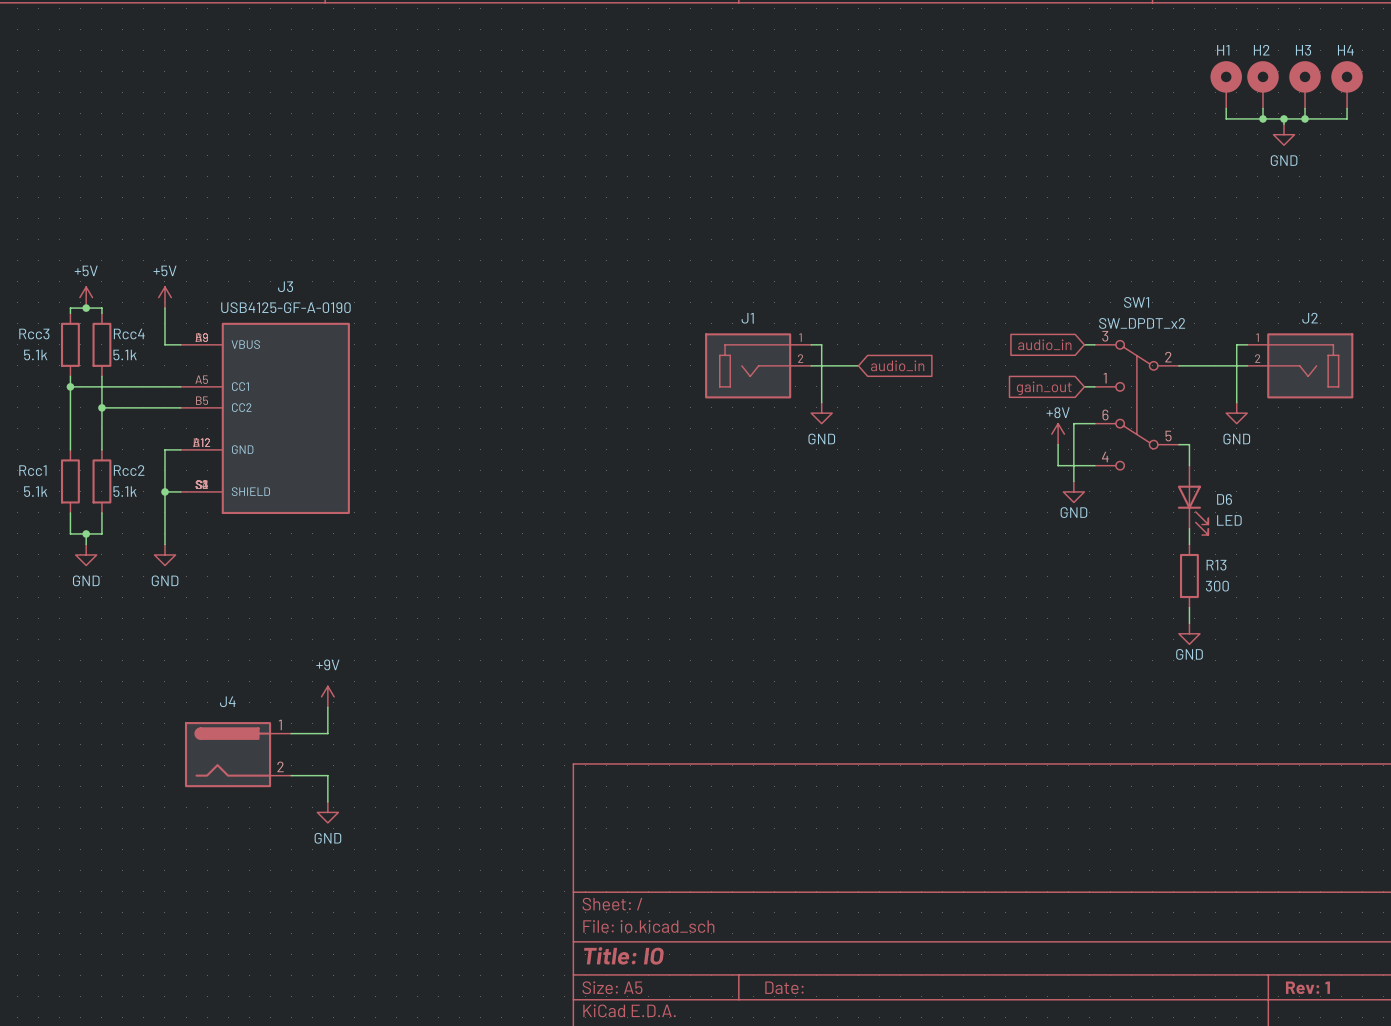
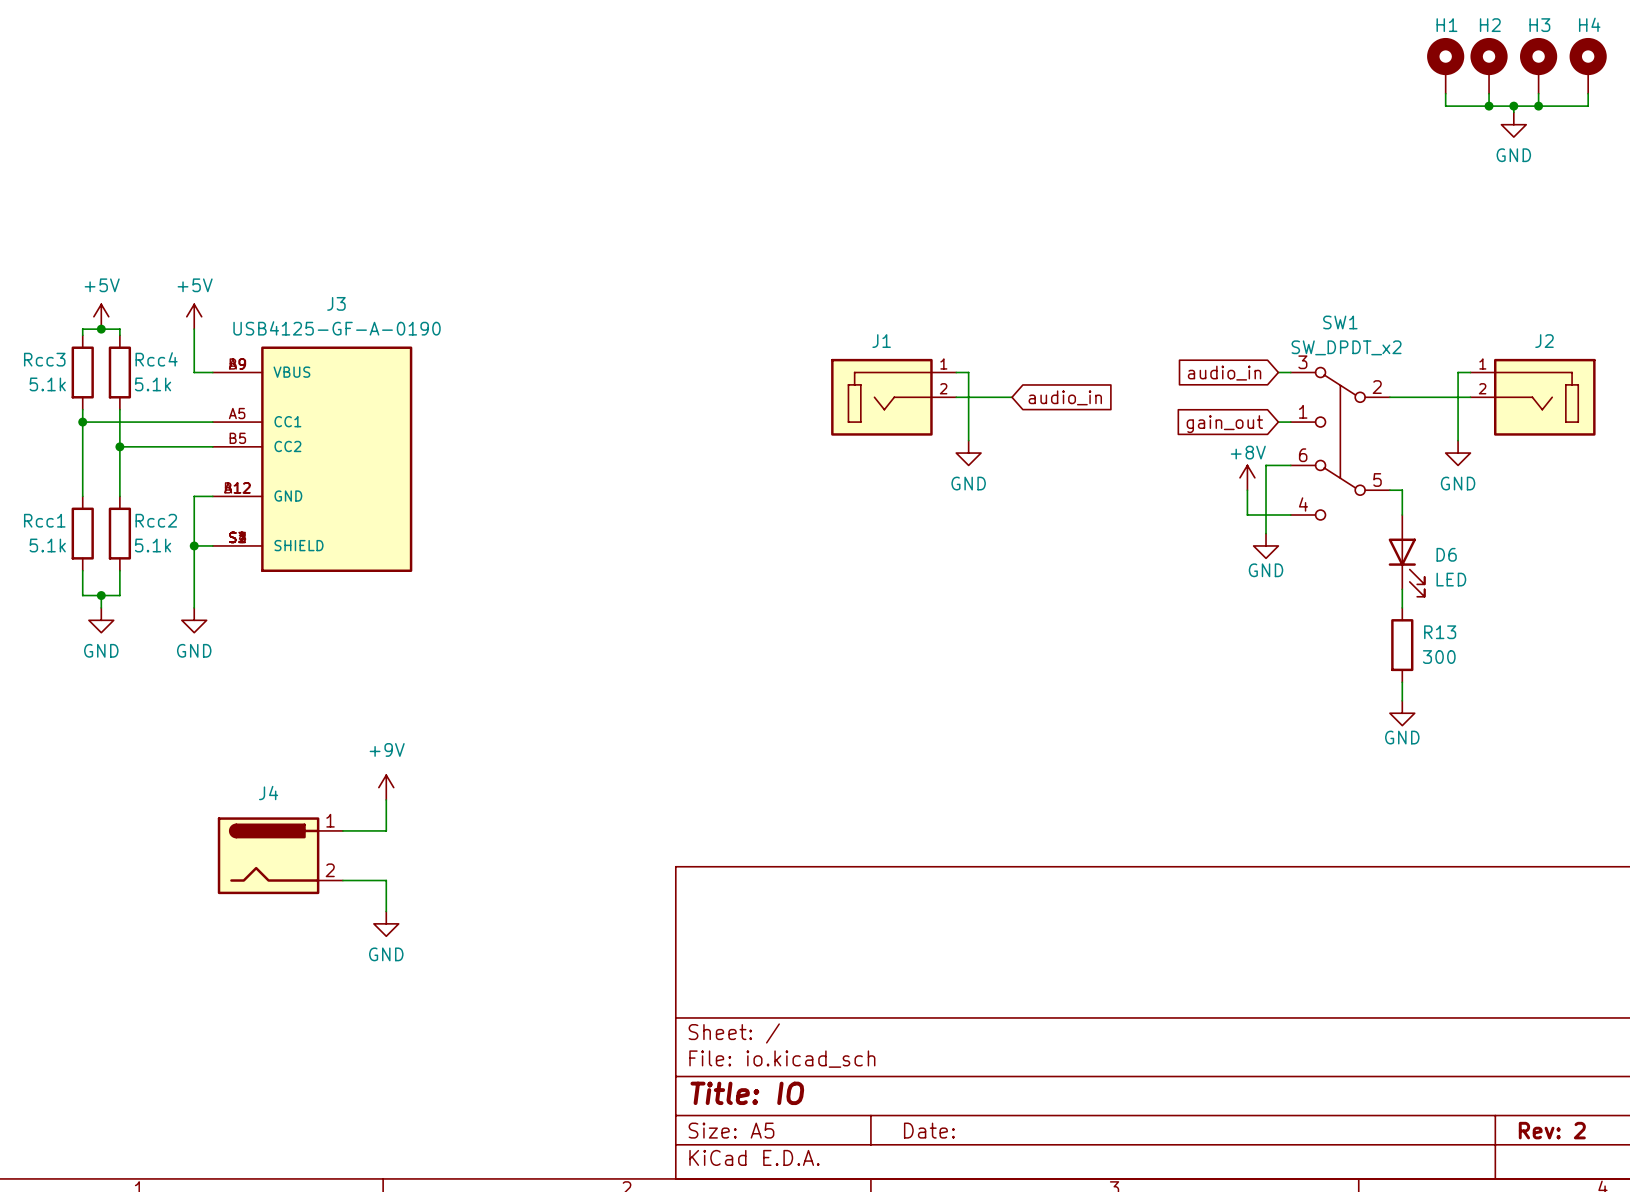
title block: Rev: 1 (1307, 987) -> Rev: 2 (1552, 1130)

